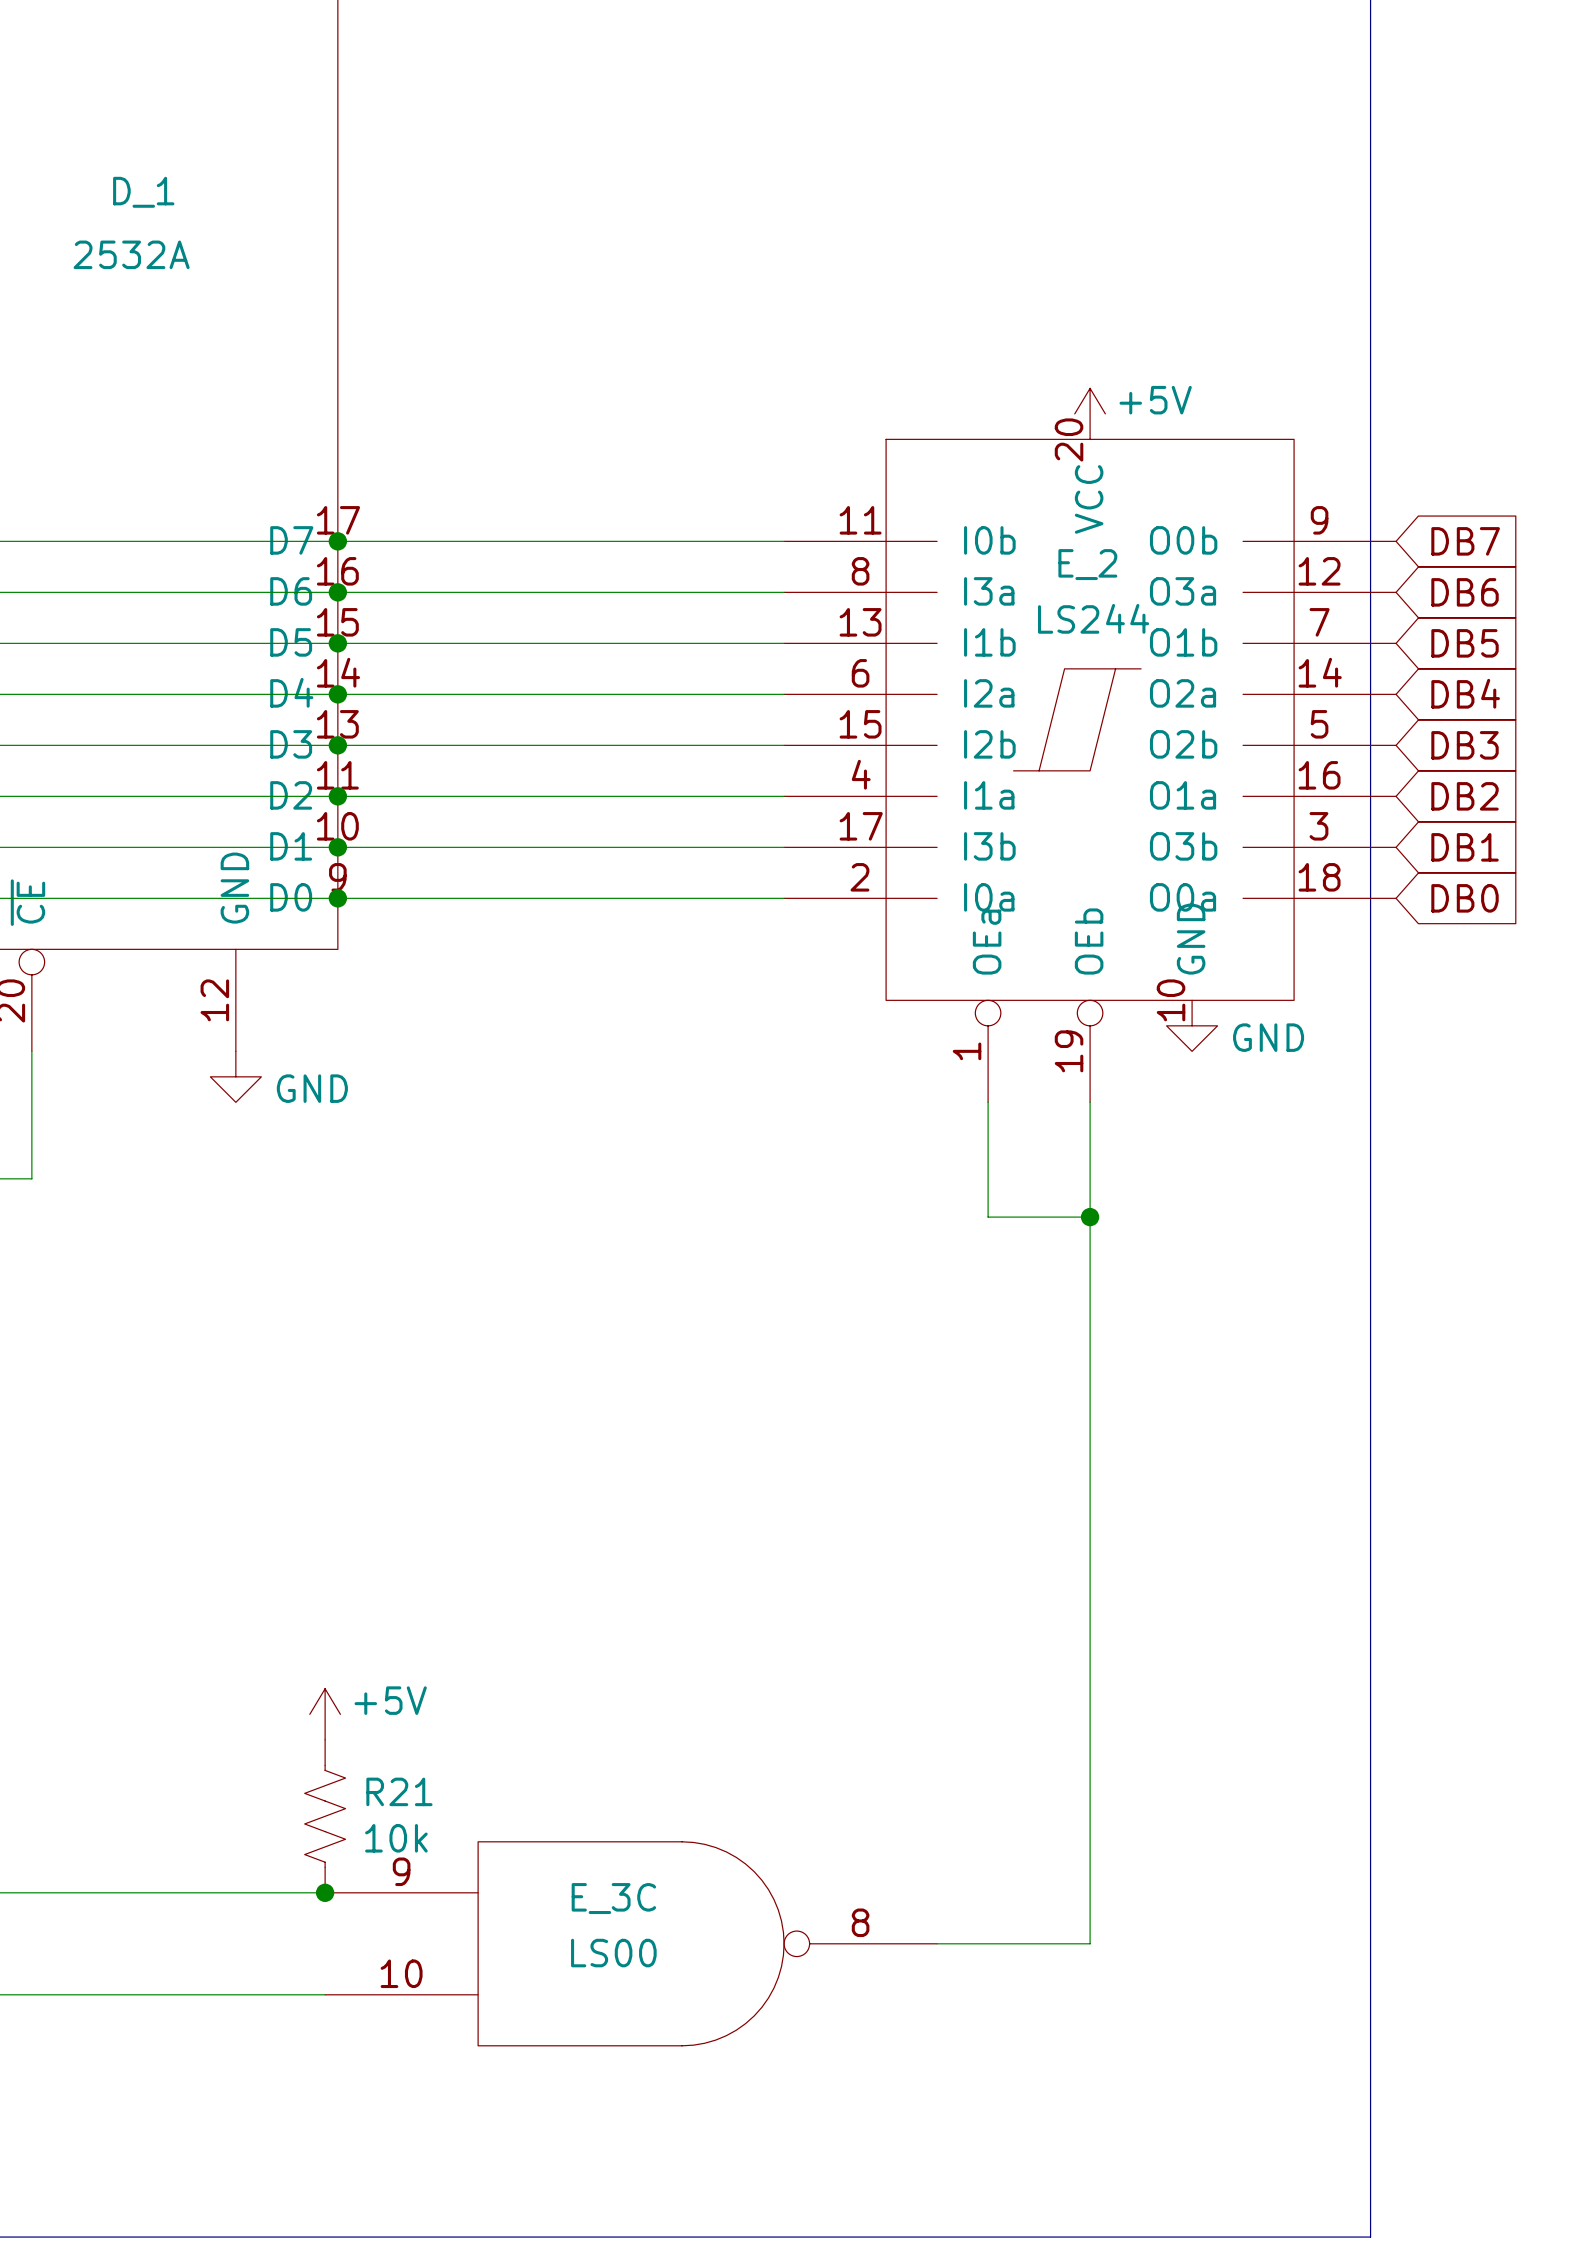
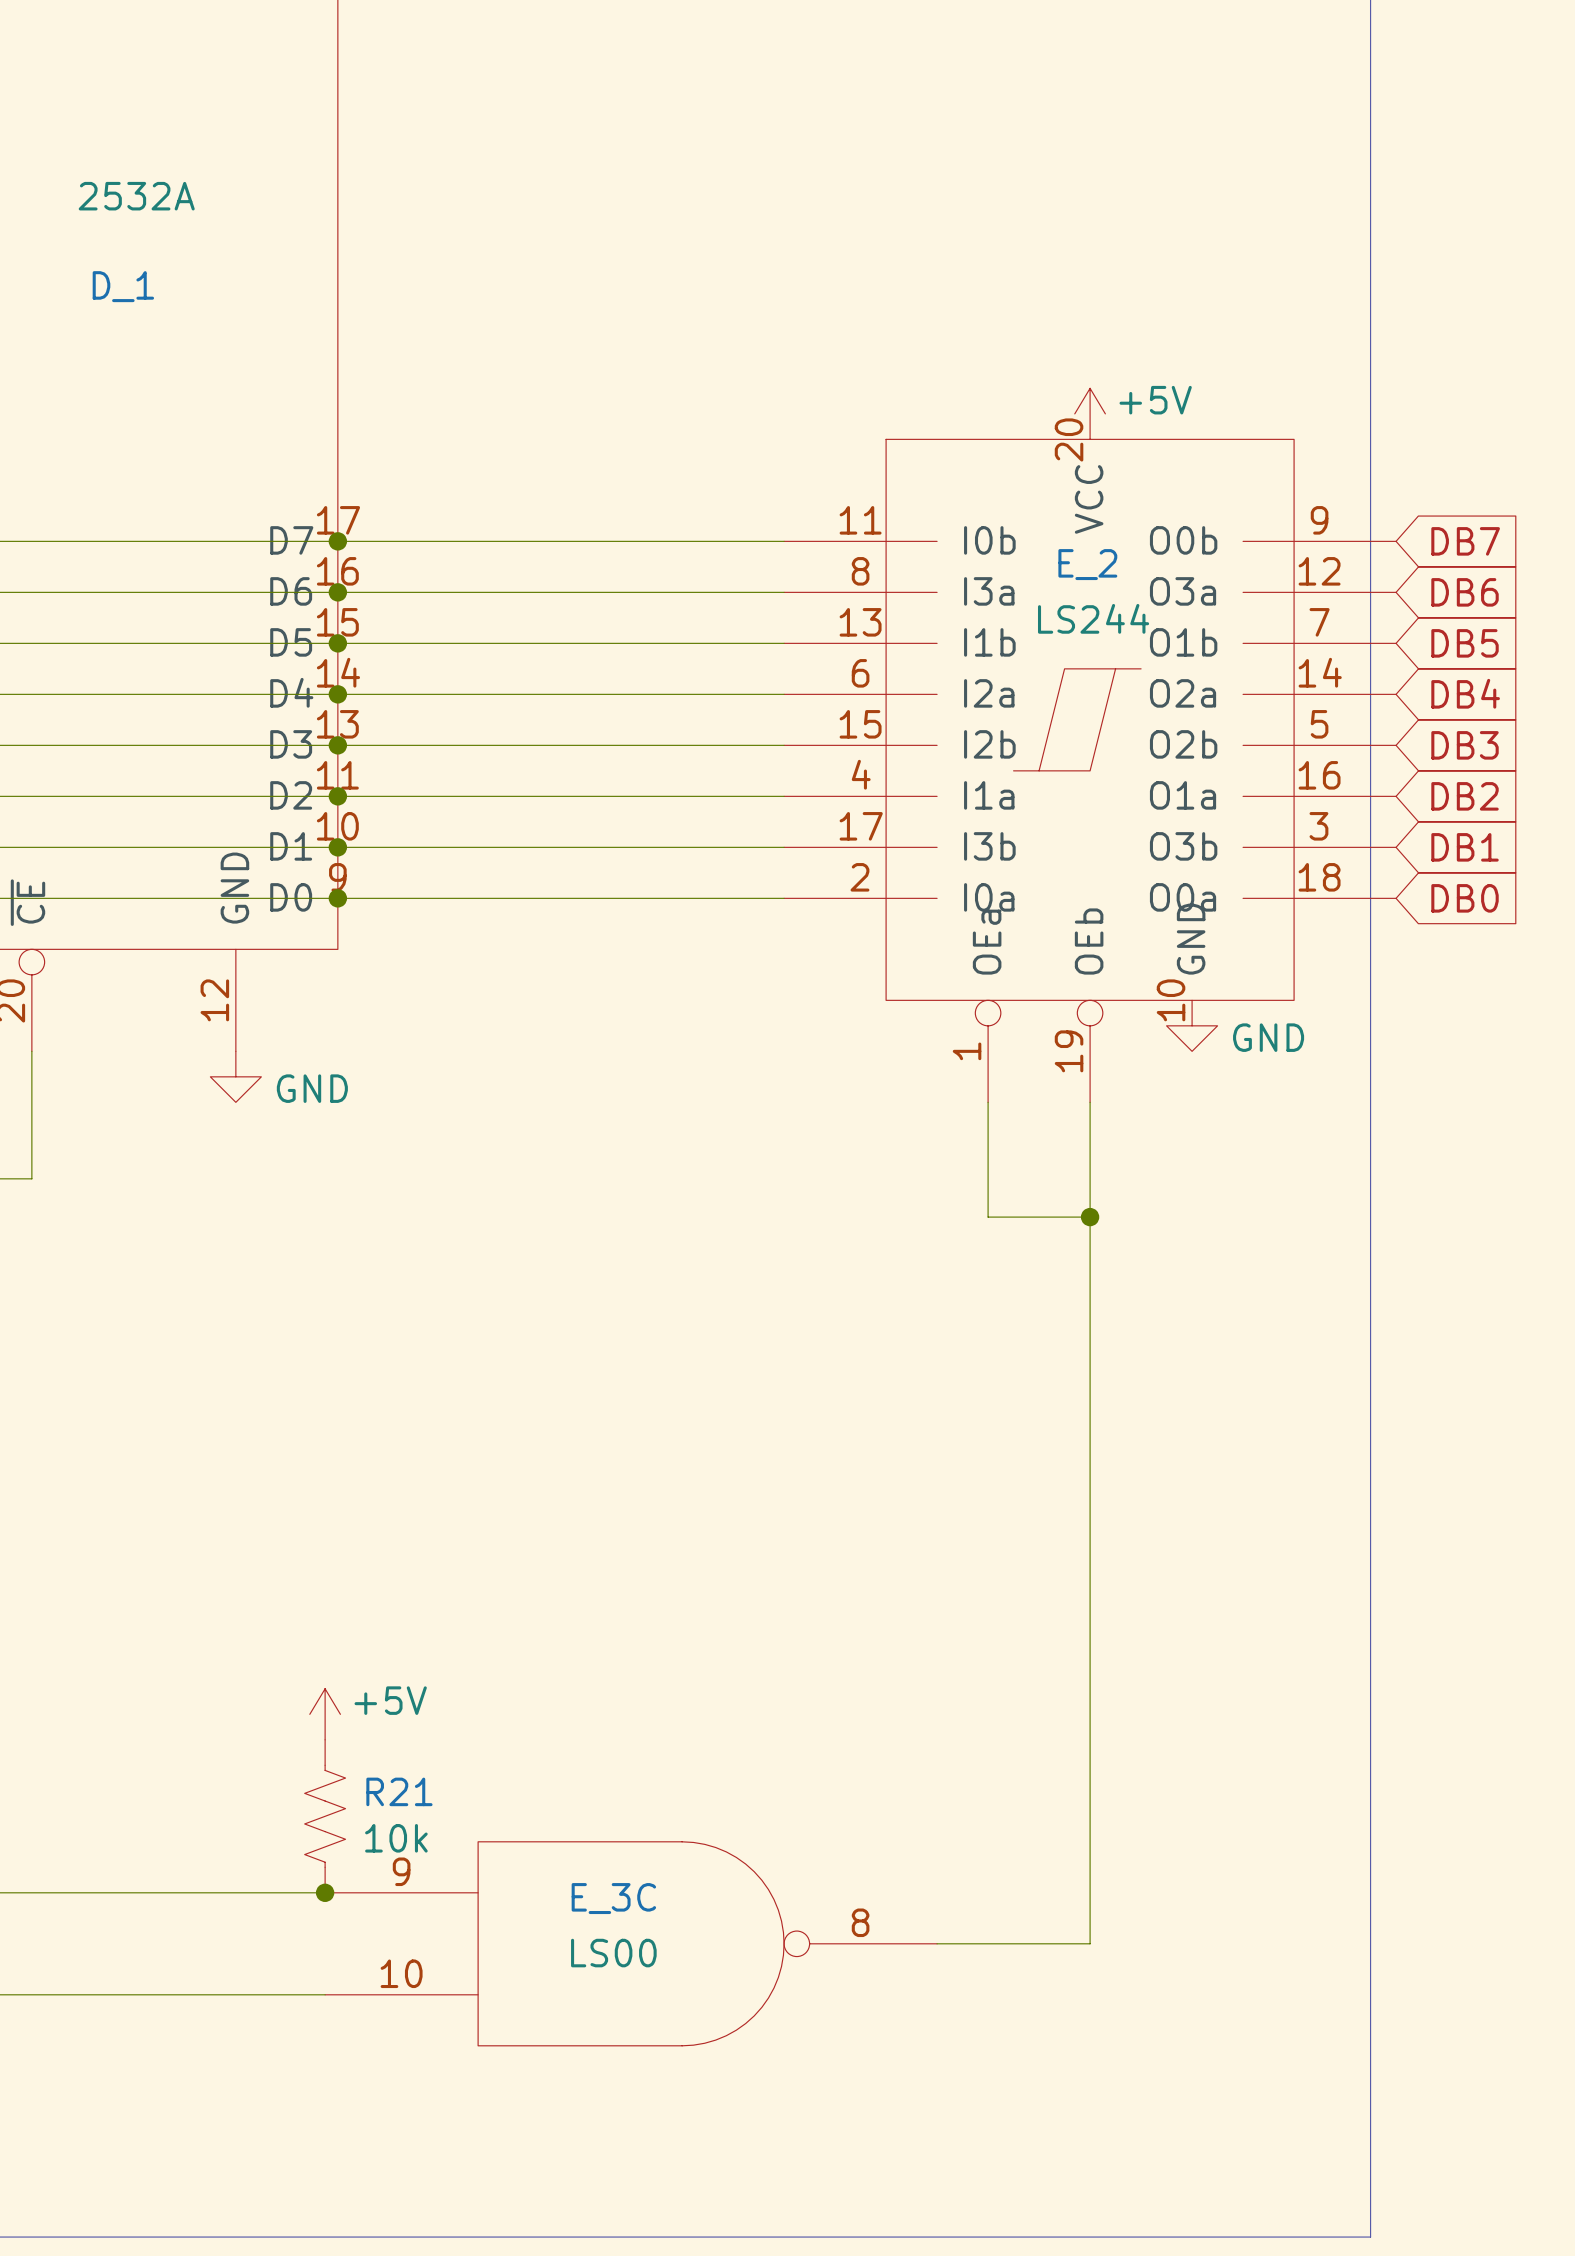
D_1 name position: D_1 (143, 192) -> D_1 (123, 286)
D_1 value position: 2532A (131, 254) -> 2532A (136, 196)

